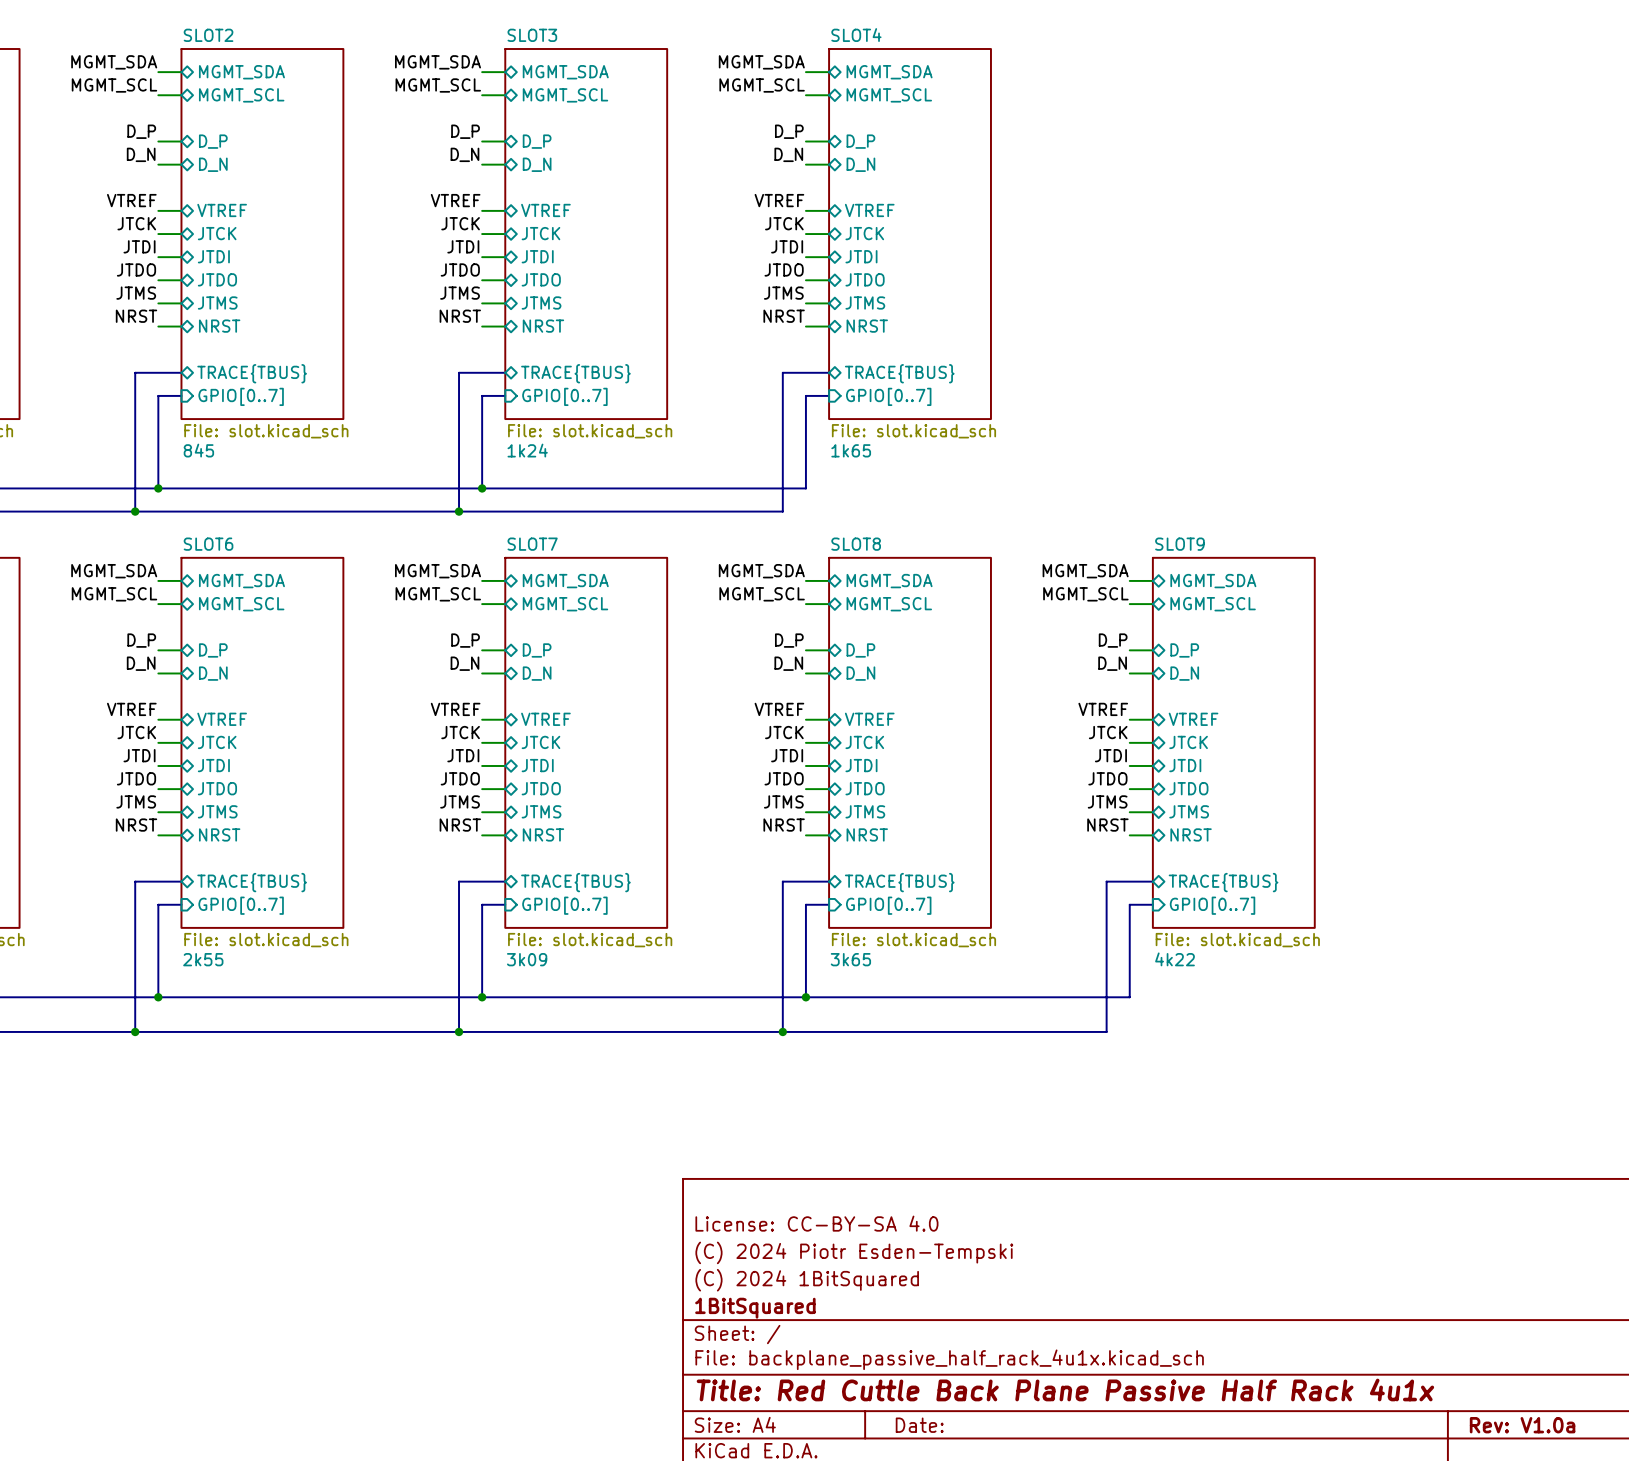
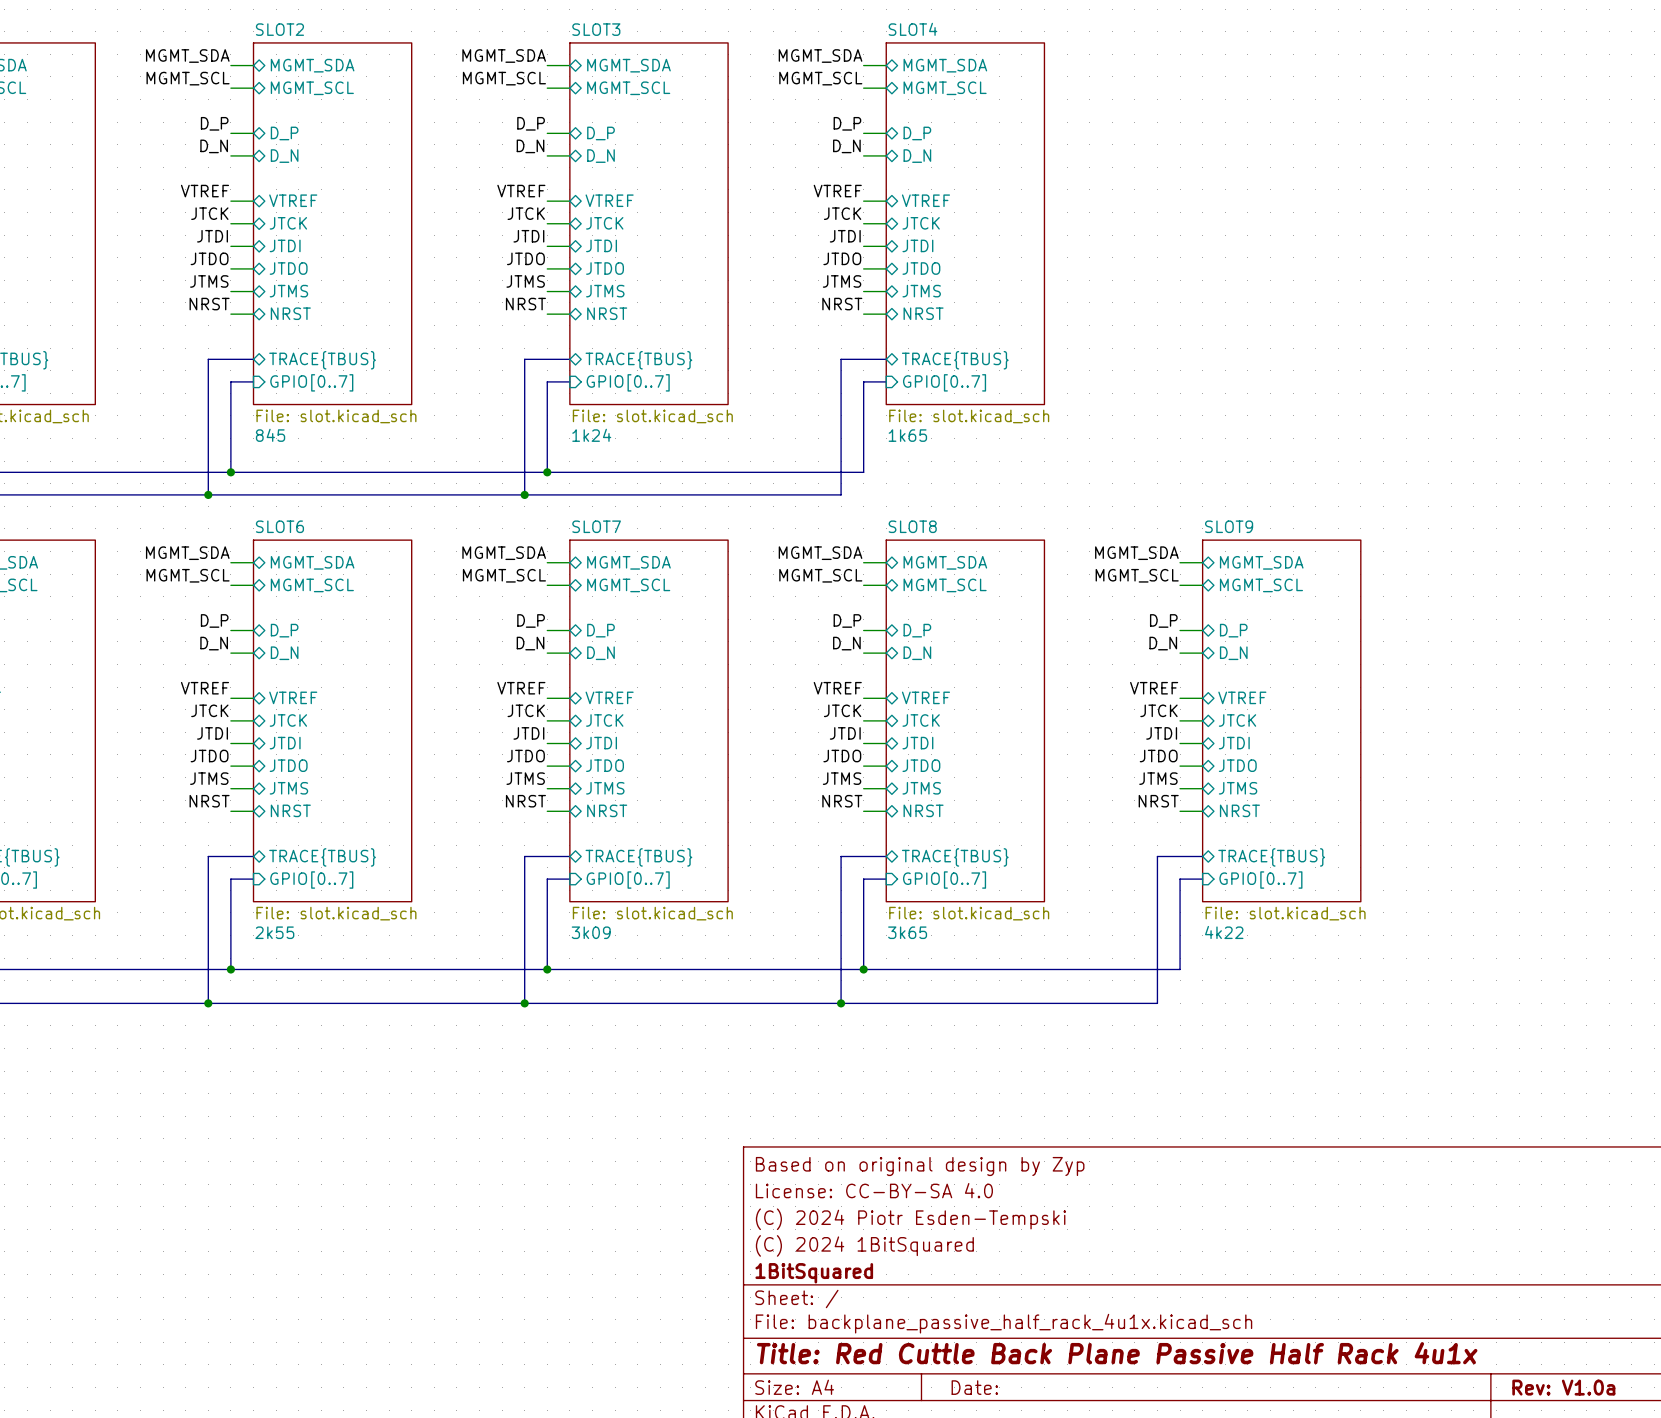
title block: none -> Based on original design by Zyp (920, 1166)

